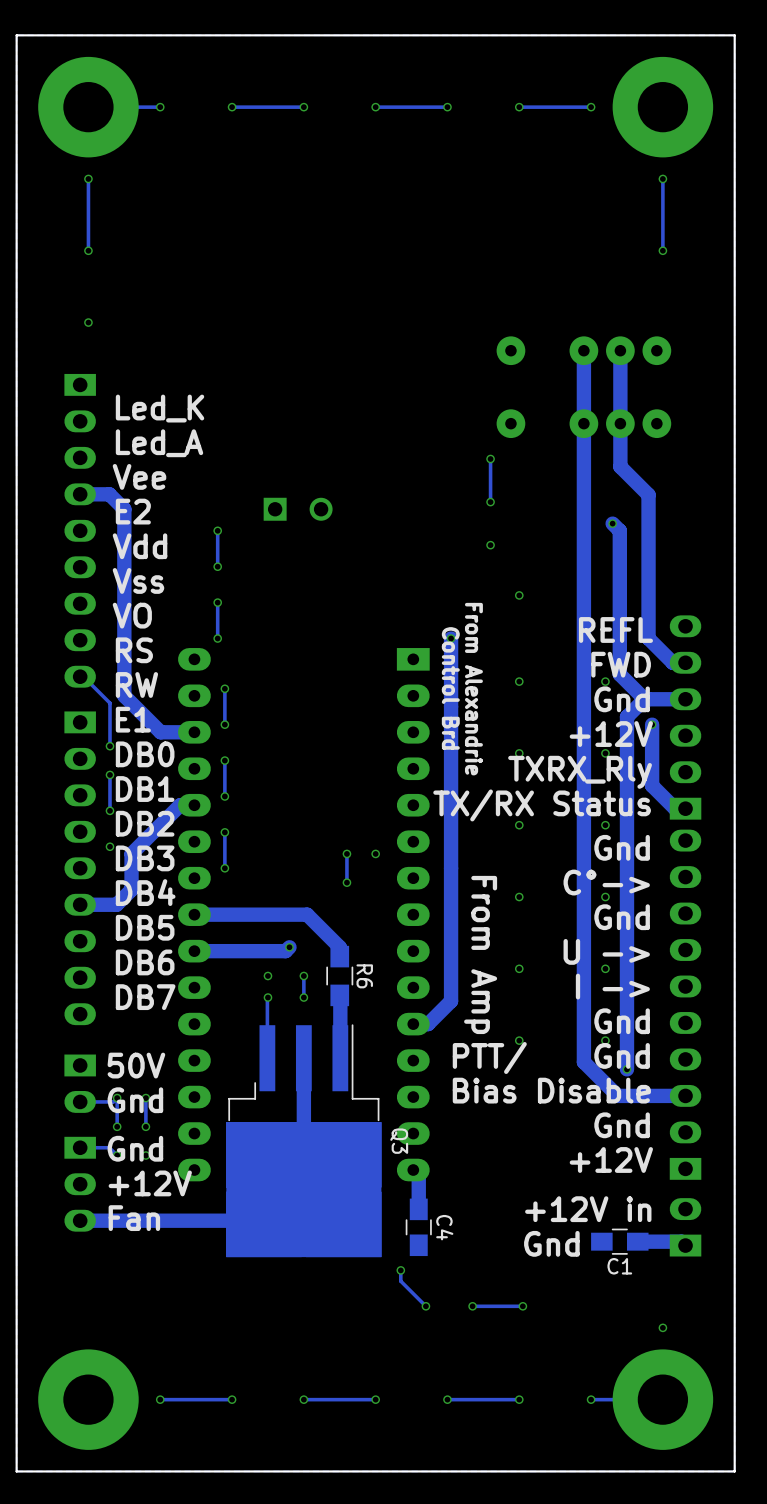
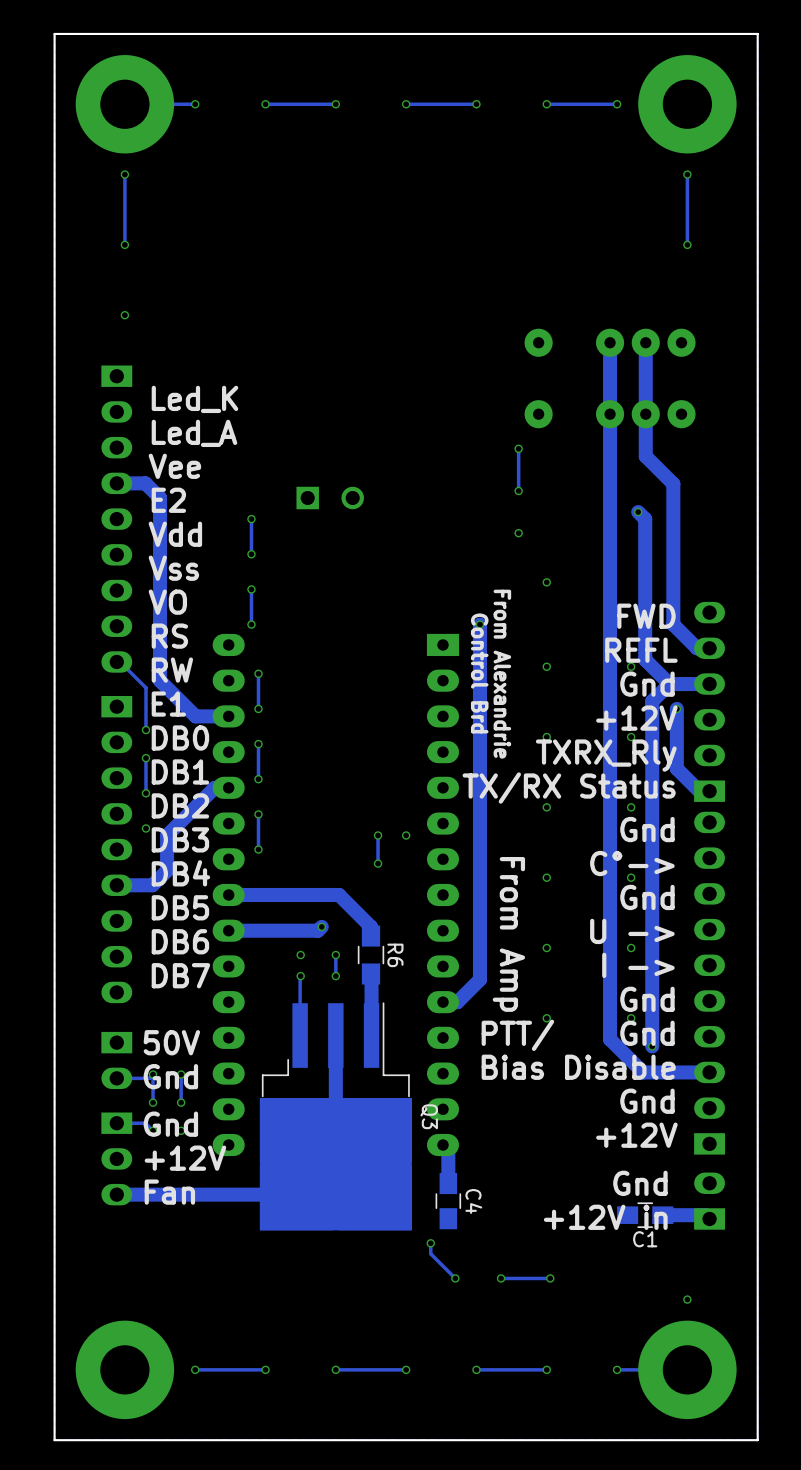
text: REFL (615, 629) -> FWD (646, 616)
text: FWD (621, 664) -> REFL (641, 650)
text position: +12V in (588, 1209) -> +12V in (605, 1217)
text position: Gnd (551, 1243) -> Gnd (640, 1183)

